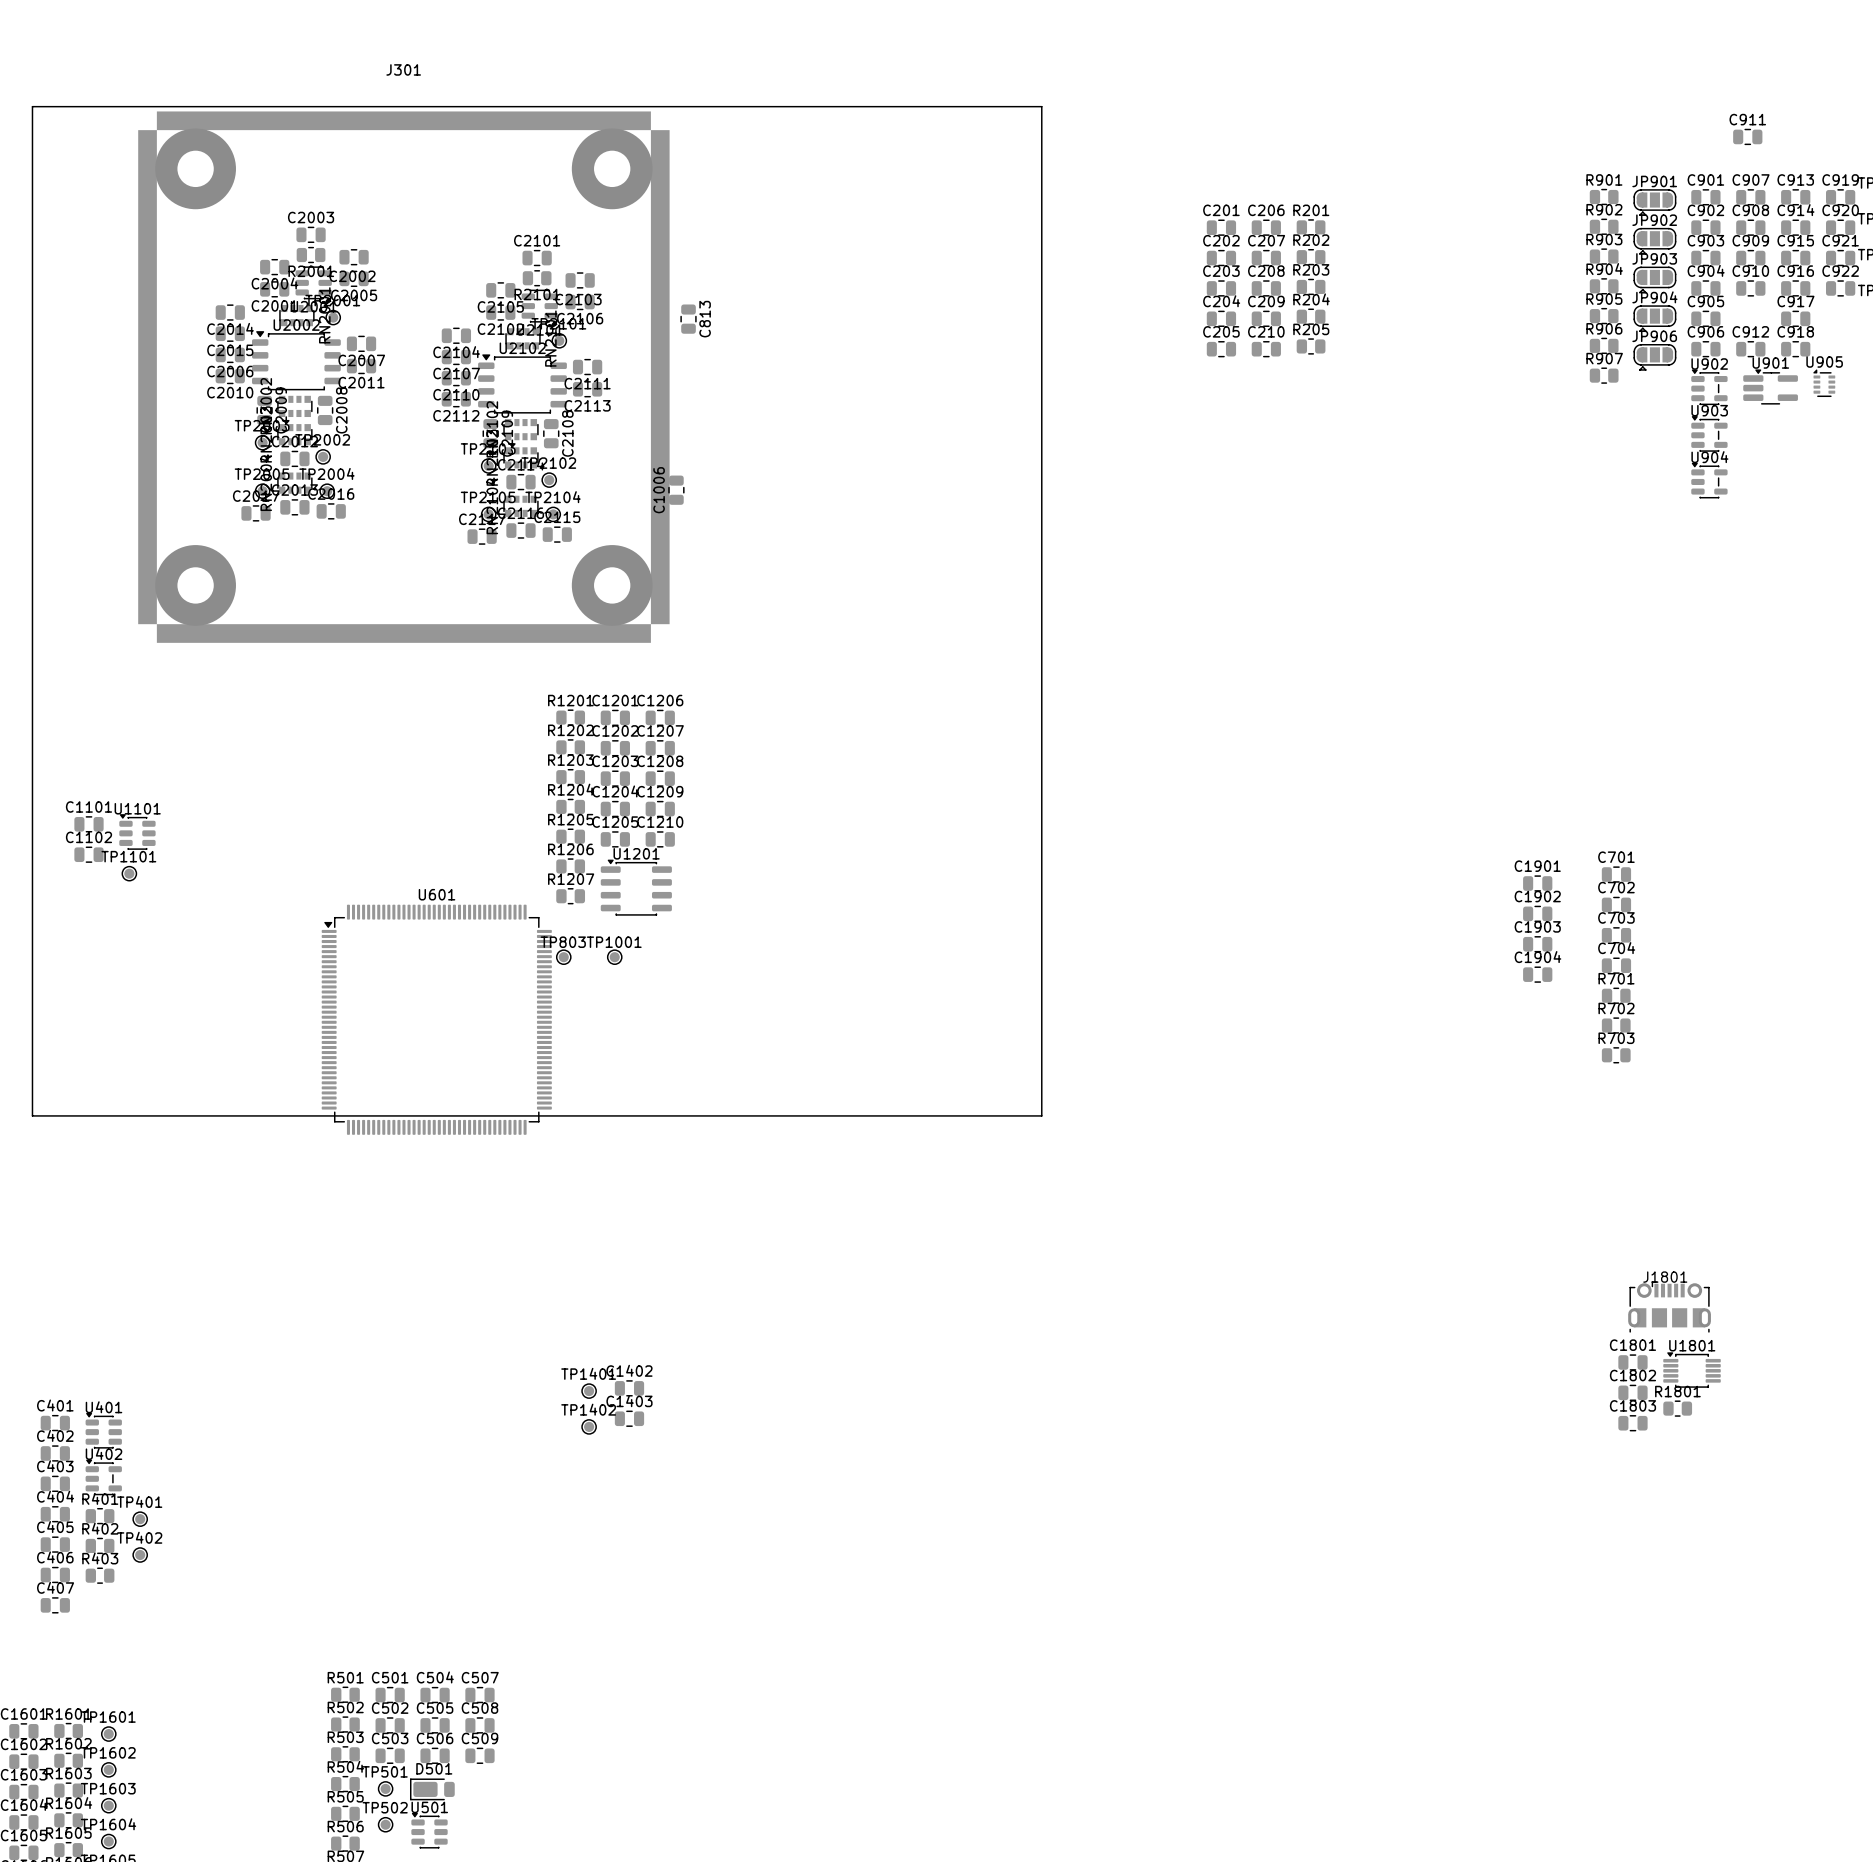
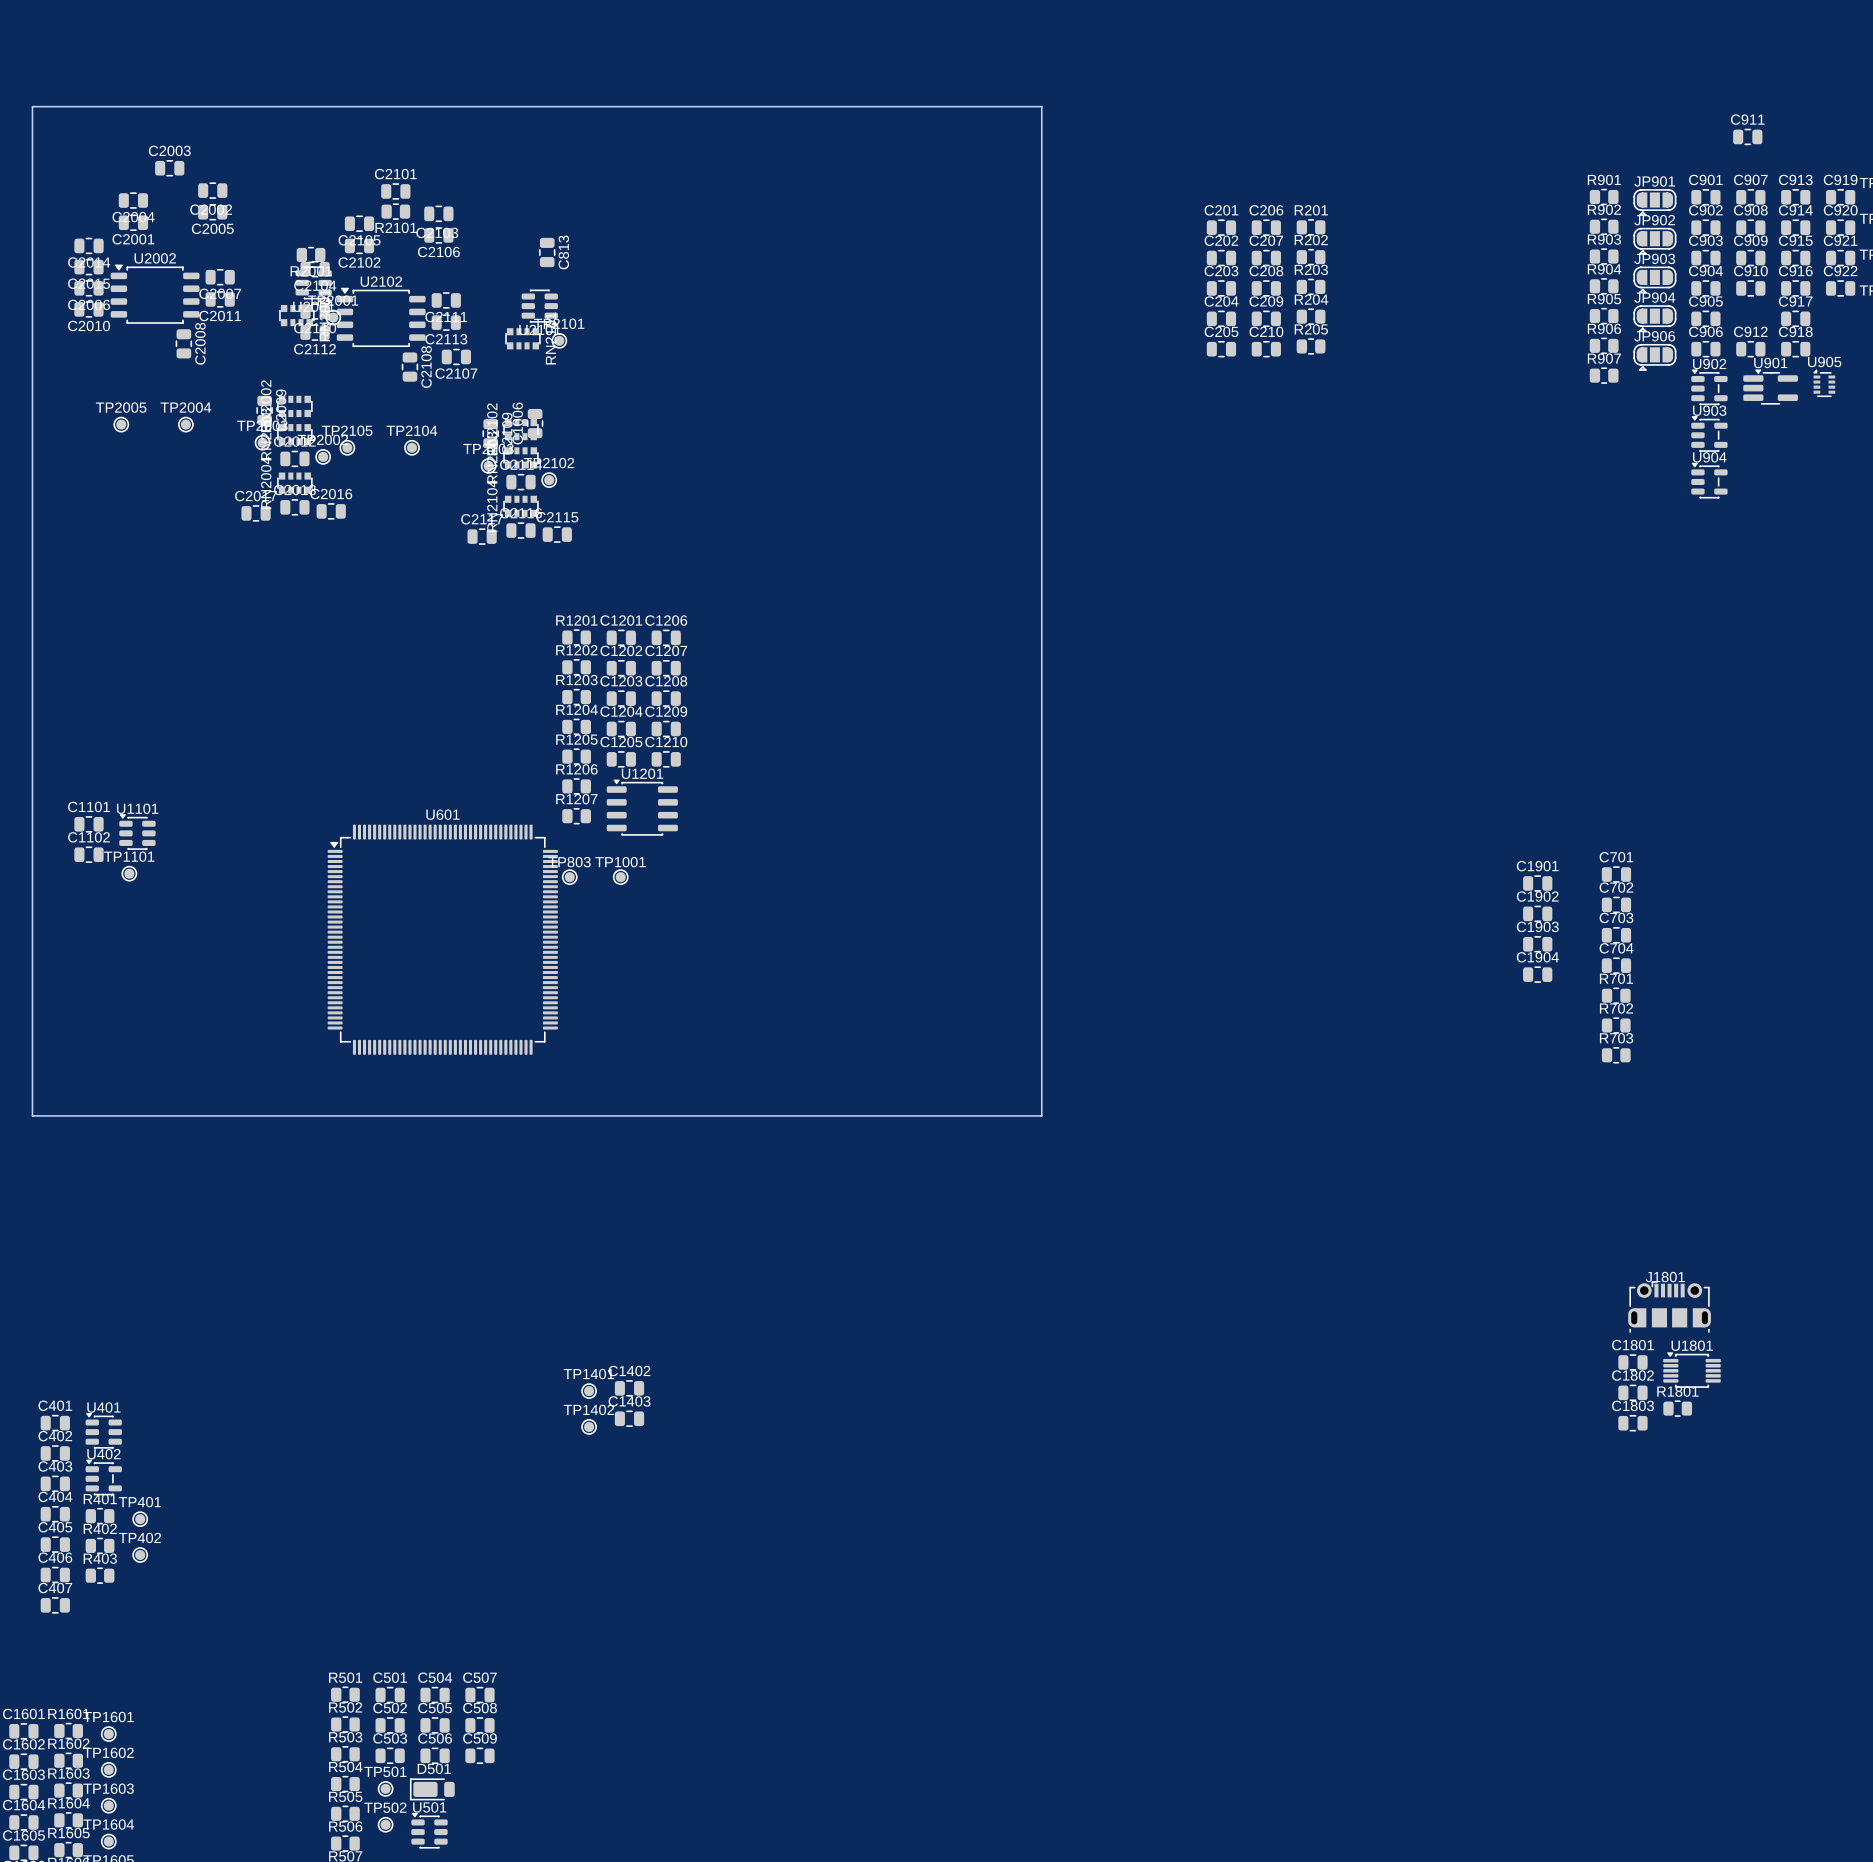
C2003 position: (311, 234) -> (169, 168)
C2002 position: (354, 257) -> (212, 190)
C2101 position: (537, 258) -> (395, 191)
C2004 position: (274, 267) -> (133, 200)
C2005 position: (354, 278) -> (212, 212)
R2101 position: (537, 278) -> (395, 211)
C2103 position: (580, 280) -> (438, 213)
C2001 position: (274, 289) -> (133, 222)
C2105 position: (500, 290) -> (359, 223)
C2106 position: (580, 302) -> (438, 235)
C2014 position: (230, 312) -> (89, 245)
C2102 position: (500, 312) -> (359, 245)
C813 position: (688, 319) -> (547, 252)
C2015 position: (230, 333) -> (89, 267)
C2104 position: (456, 335) -> (315, 269)
C2007 position: (361, 343) -> (220, 277)
C2006 position: (230, 354) -> (89, 288)
U2002 position: (296, 360) -> (155, 294)
C2011 position: (361, 366) -> (220, 299)
C2111 position: (587, 367) -> (446, 300)
C2010 position: (230, 376) -> (88, 309)
J301: (403, 377) -> none
C2110 position: (456, 378) -> (315, 311)
U2102 position: (522, 383) -> (381, 317)
C2113 position: (587, 389) -> (446, 322)
C2112 position: (456, 399) -> (315, 332)
C2008 position: (325, 410) -> (183, 343)
C2108 position: (551, 433) -> (409, 367)
C1006 position: (676, 490) -> (535, 423)
TP2005 position: (262, 491) -> (121, 424)
TP2004 position: (327, 491) -> (185, 424)
TP2105 position: (488, 514) -> (347, 447)
TP2104 position: (553, 514) -> (411, 447)
R1201 position: (570, 717) -> (576, 637)
C1201 position: (615, 717) -> (621, 637)
C1206 position: (660, 717) -> (666, 637)
R1202 position: (570, 747) -> (576, 667)
C1202 position: (615, 748) -> (621, 668)
C1207 position: (660, 748) -> (666, 668)
R1203 position: (570, 777) -> (576, 697)
C1203 position: (615, 778) -> (621, 698)
C1208 position: (660, 778) -> (666, 698)
R1204 position: (570, 806) -> (576, 726)
C1204 position: (615, 809) -> (621, 728)
C1209 position: (660, 809) -> (666, 728)
R1205 position: (570, 836) -> (576, 756)
C1205 position: (615, 839) -> (621, 759)
C1210 position: (660, 839) -> (666, 759)
R1206 position: (570, 866) -> (576, 786)
U1201 position: (636, 887) -> (642, 807)
R1207 position: (570, 896) -> (576, 816)
TP803 position: (563, 957) -> (569, 877)
TP1001 position: (614, 957) -> (620, 877)
U601 position: (436, 1019) -> (442, 939)

